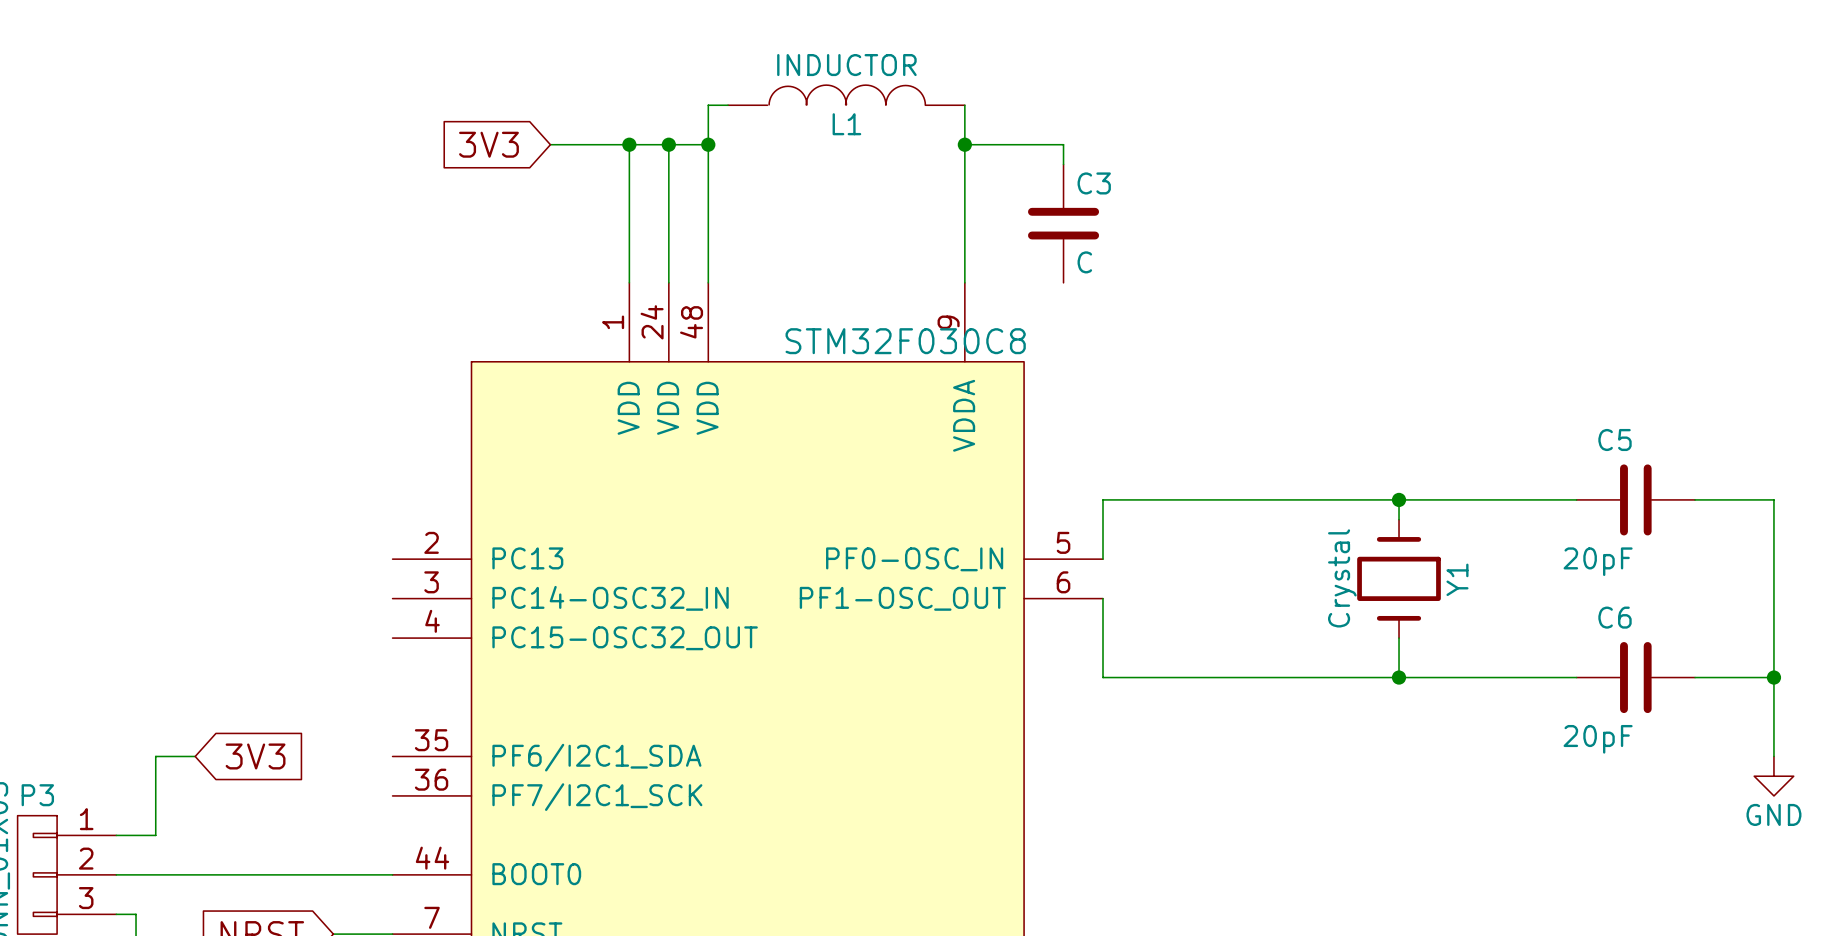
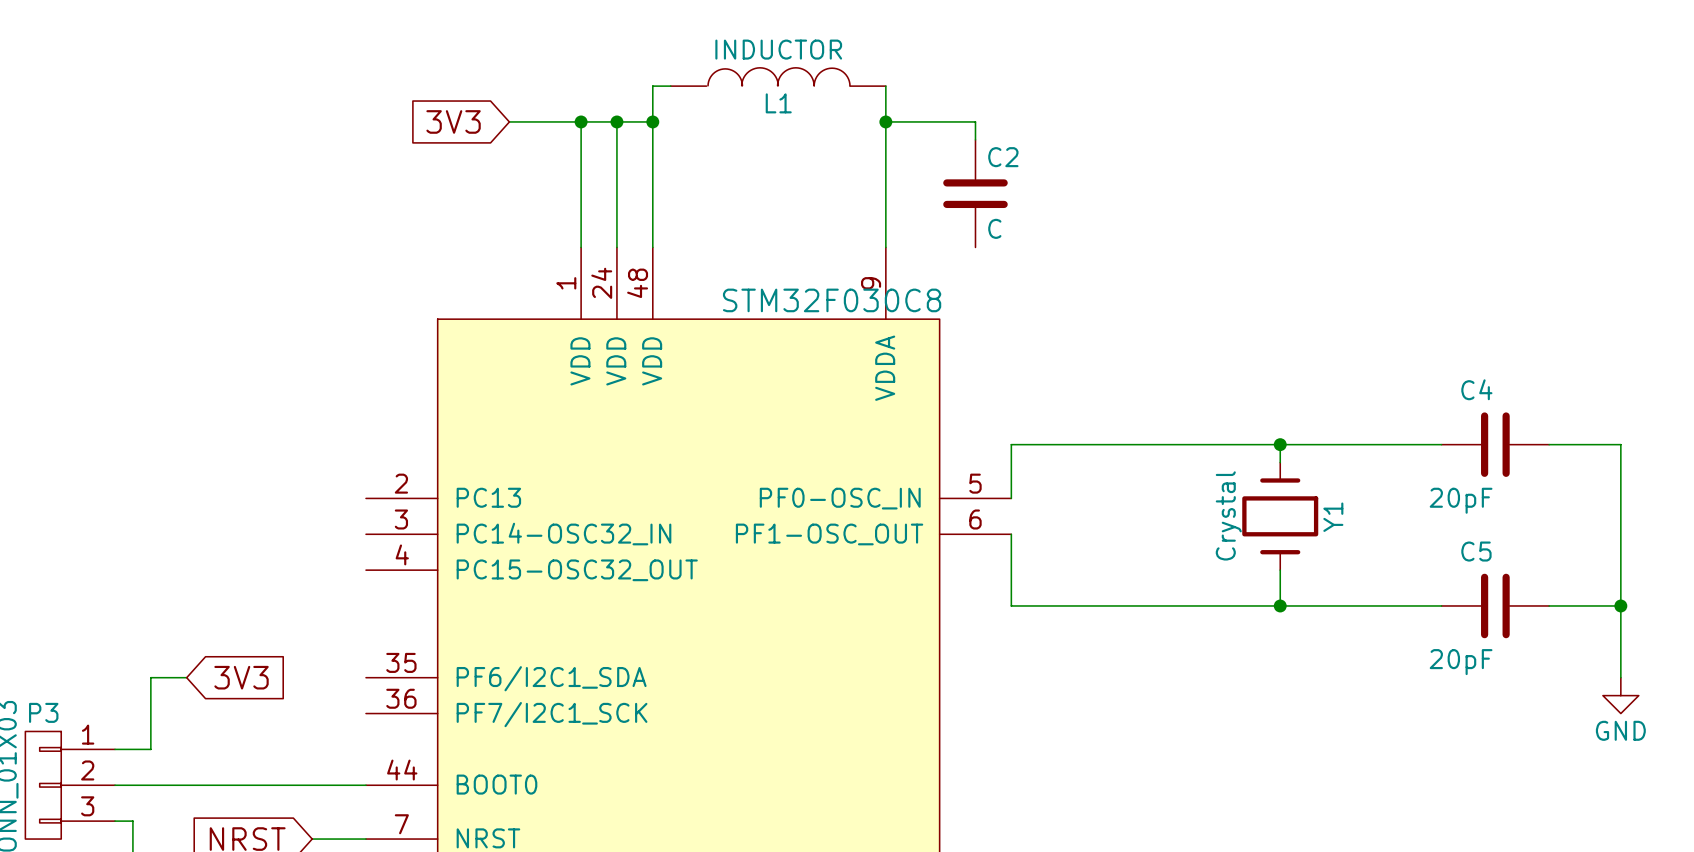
C3 name: C3 (1094, 183) -> C2 (1003, 157)
C5 name: C5 (1615, 439) -> C4 (1476, 389)
C6 name: C6 (1615, 617) -> C5 (1476, 551)

